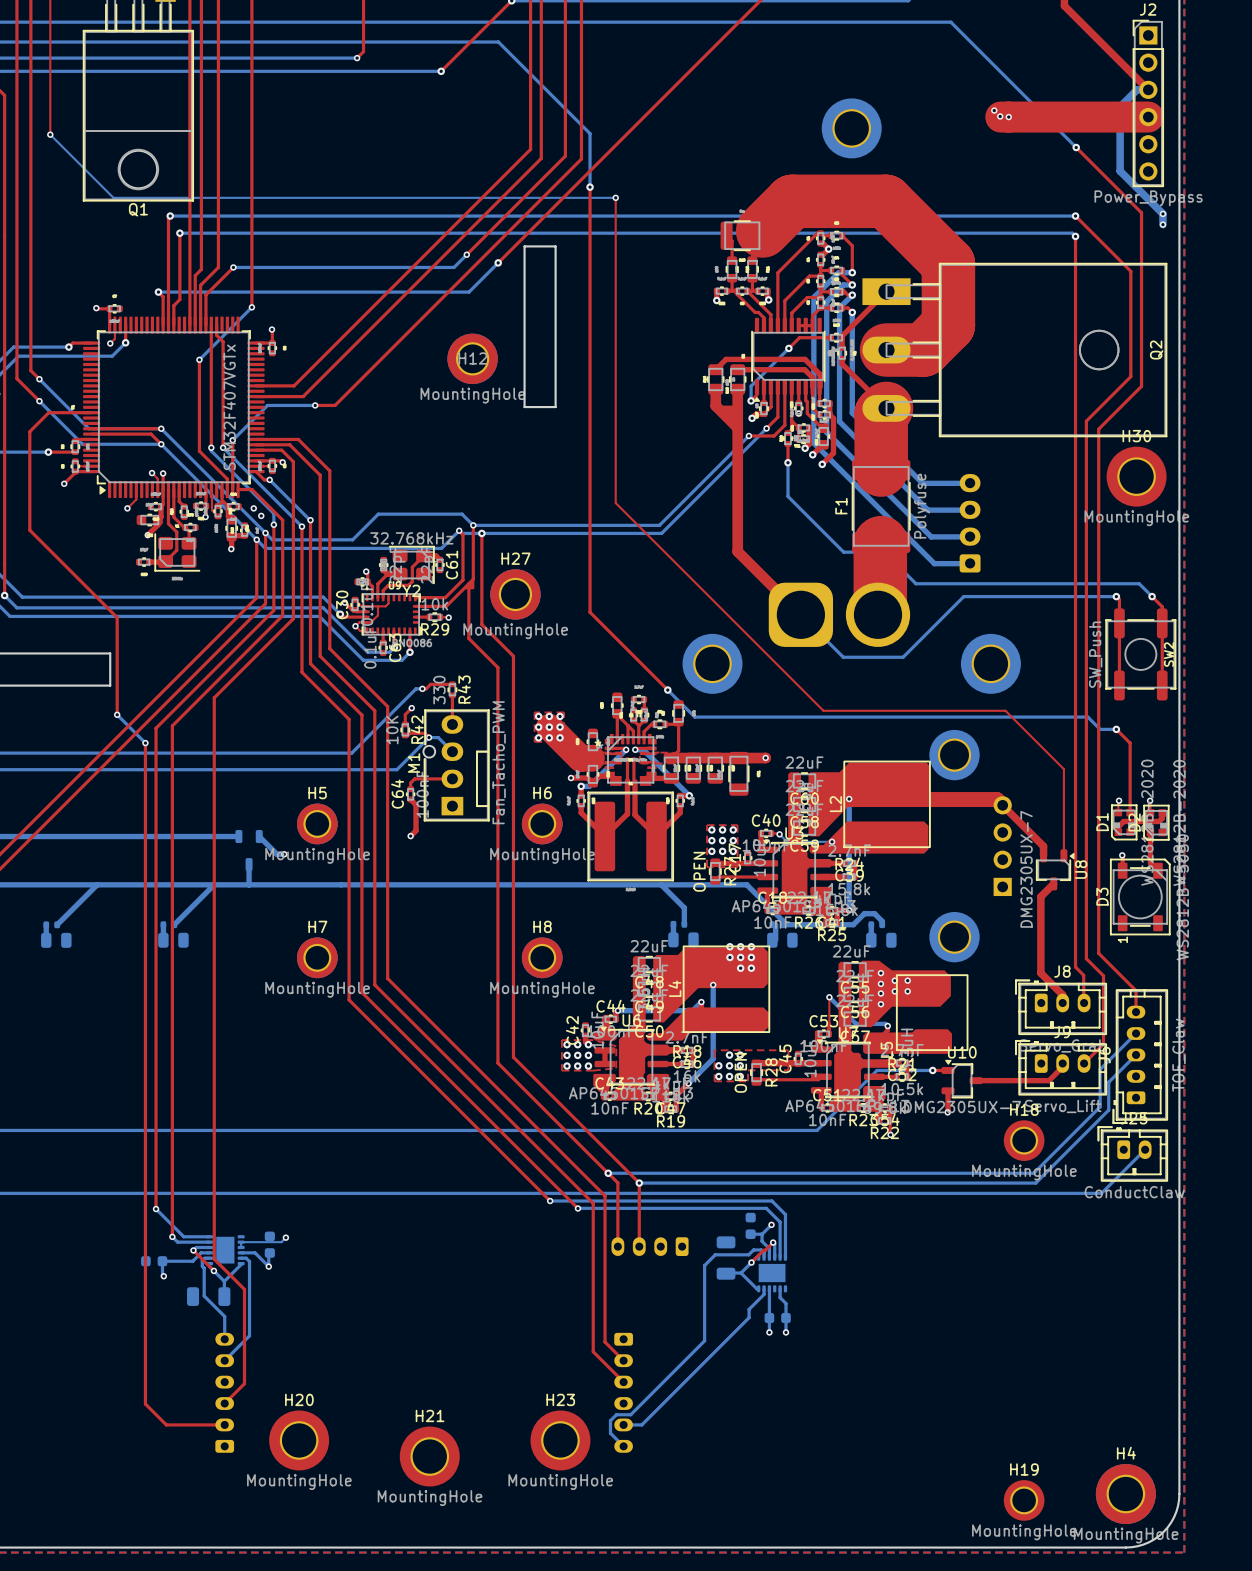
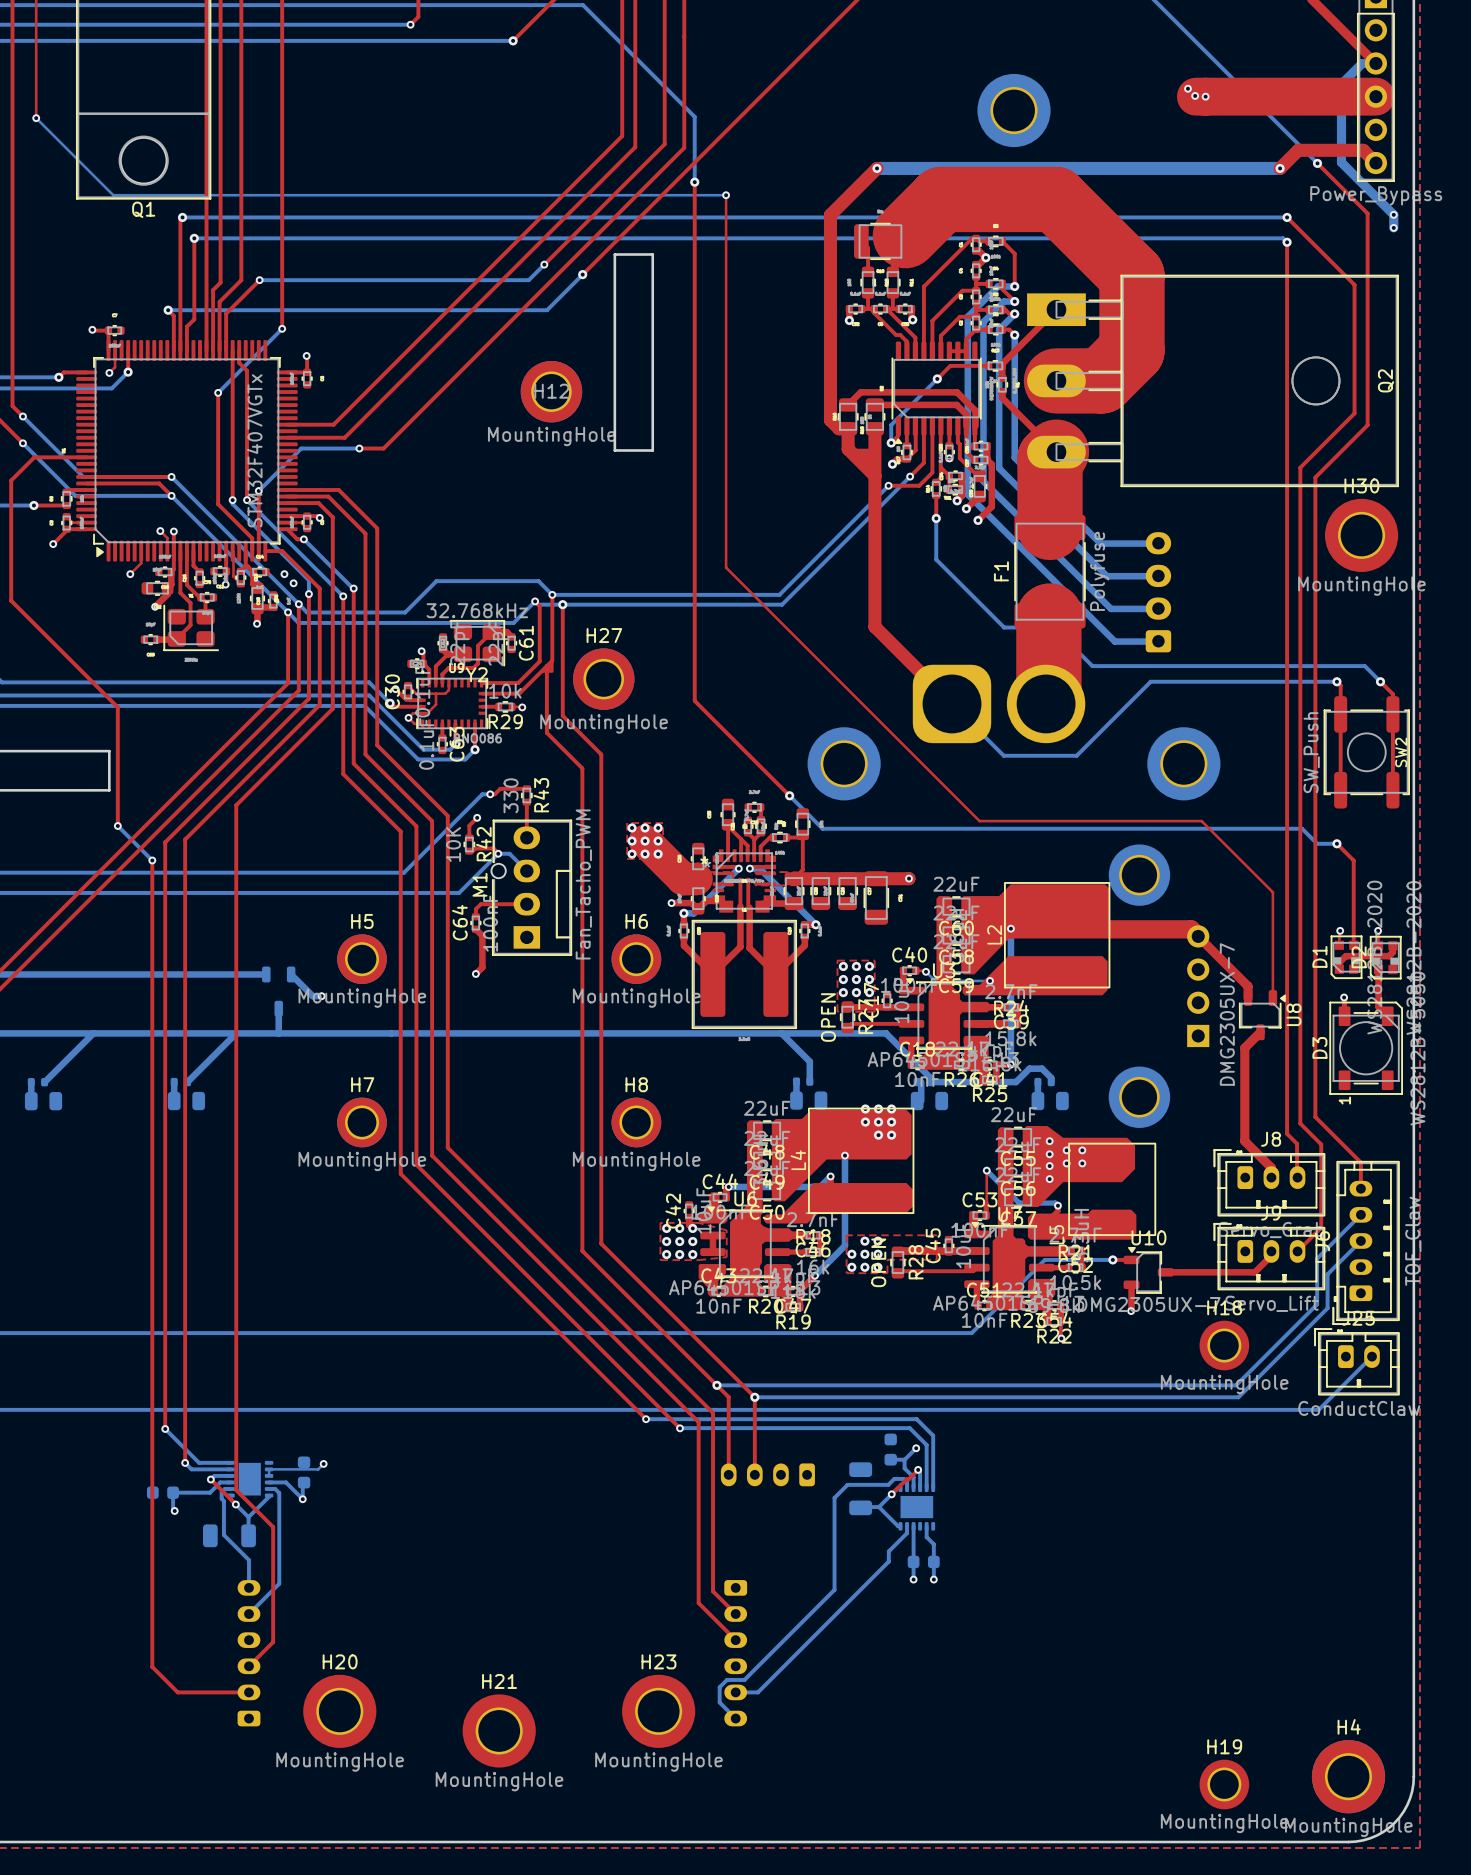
top track: (1076, 147) (1100, 171) -> none
bottom track: none -> (1287, 133) (1317, 163)
via: (1076, 147) -> none
via: none -> (1317, 163)
top track: none -> (1375, 163) (1363, 150) (1298, 150) (1280, 168)
top track: none -> (877, 168) (830, 214) (830, 420) (838, 428) (848, 428)
bottom track: none -> (877, 168) (1280, 168)
via: none -> (877, 168)
via: none -> (1280, 168)

